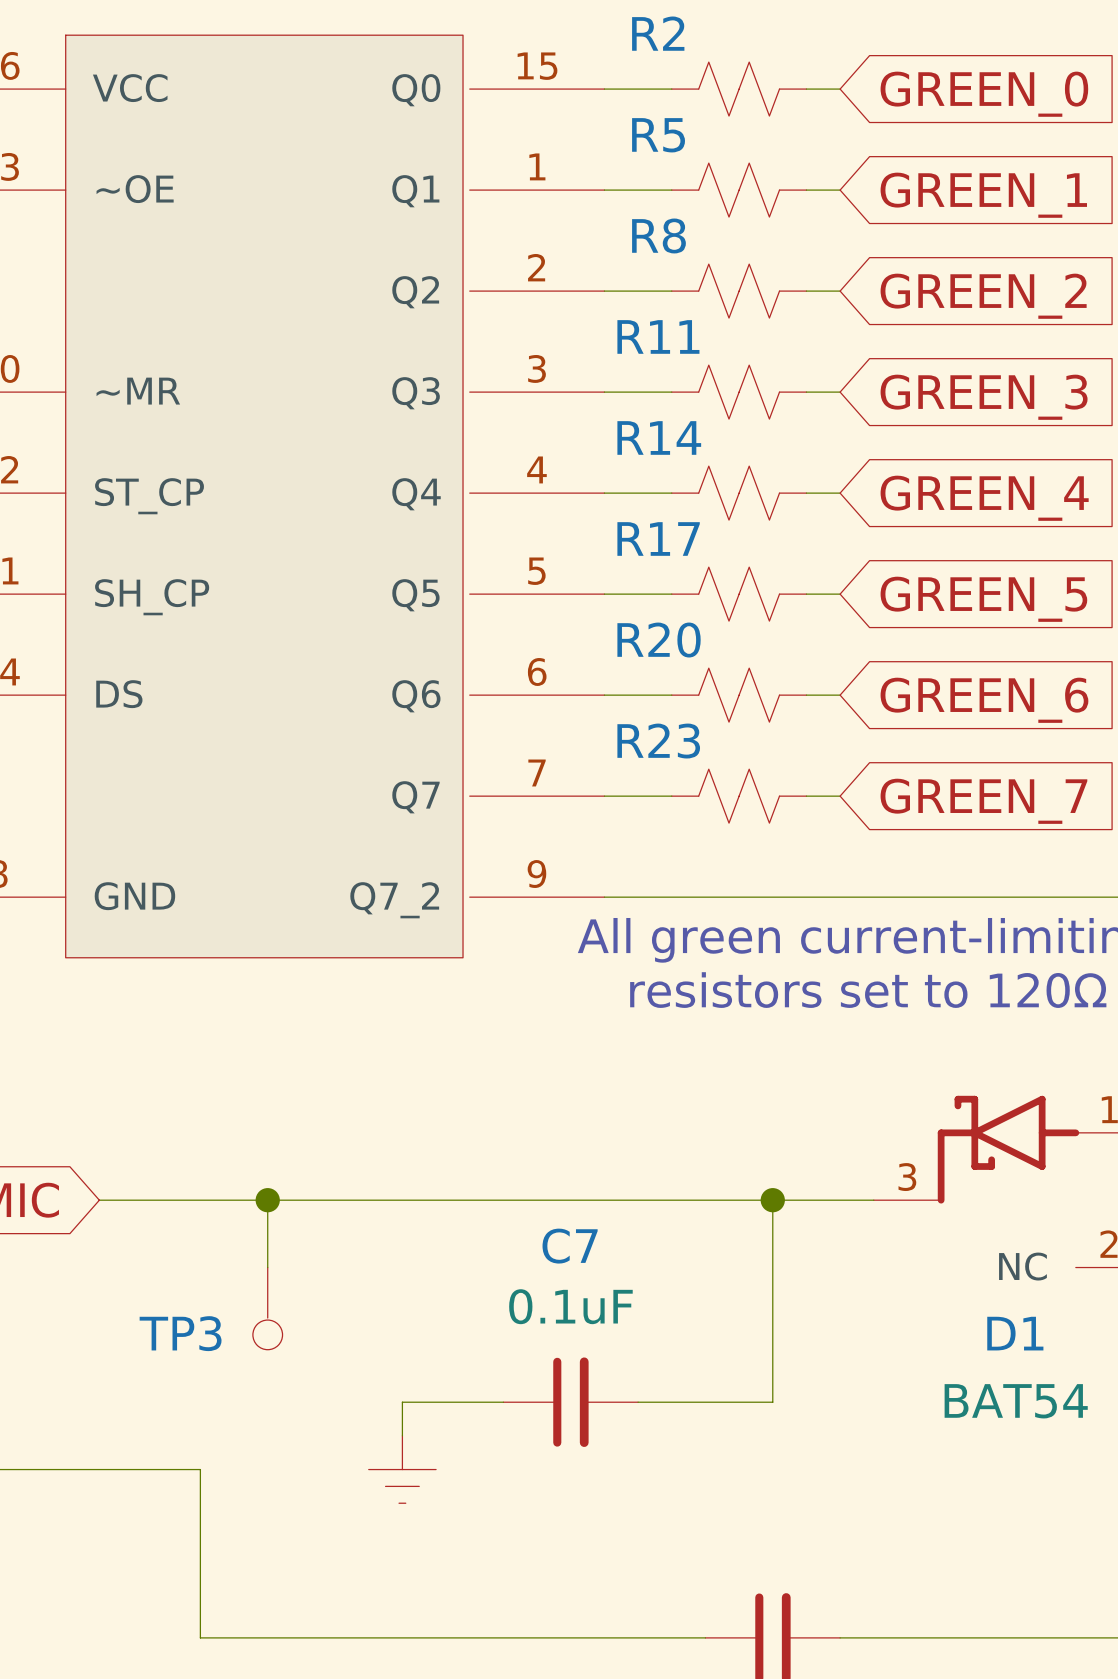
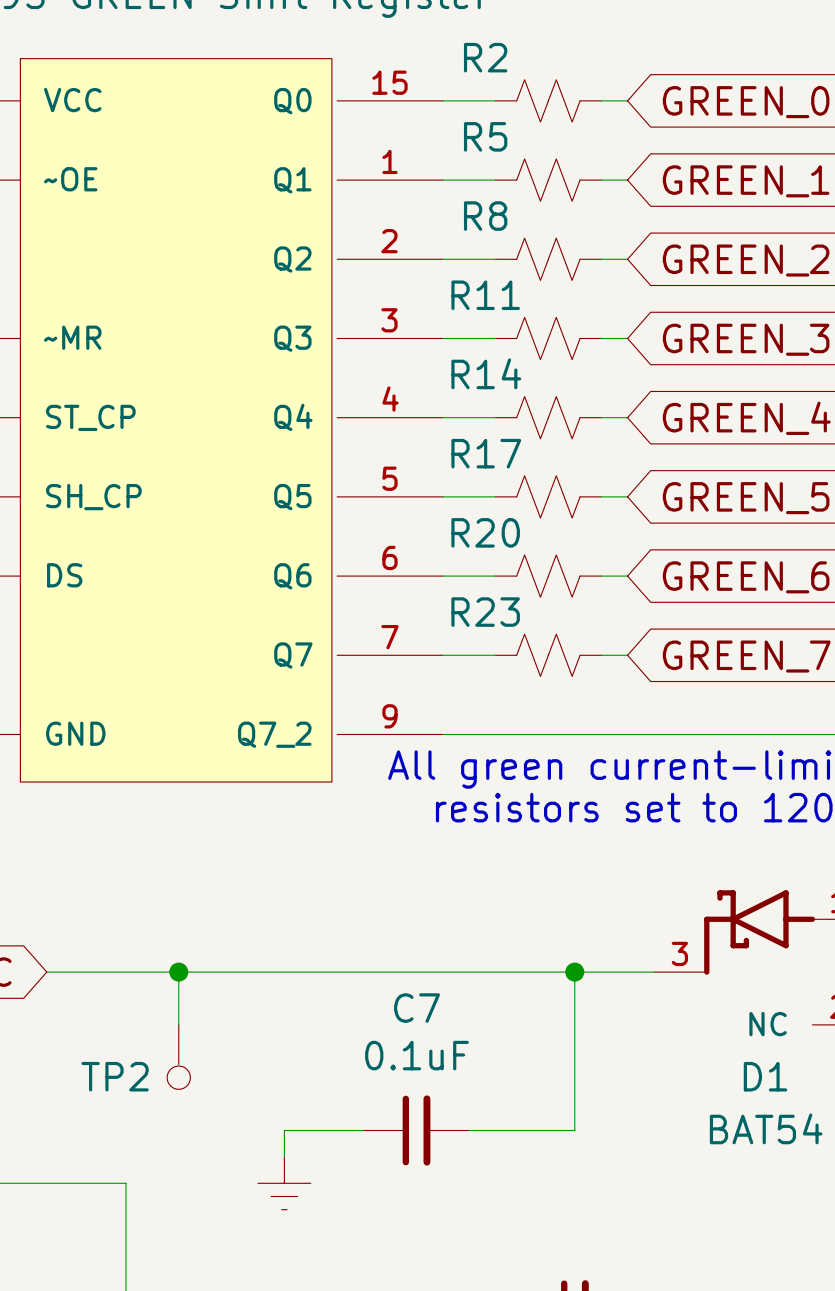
TP3 name: TP3 (180, 1333) -> TP2 (115, 1076)

